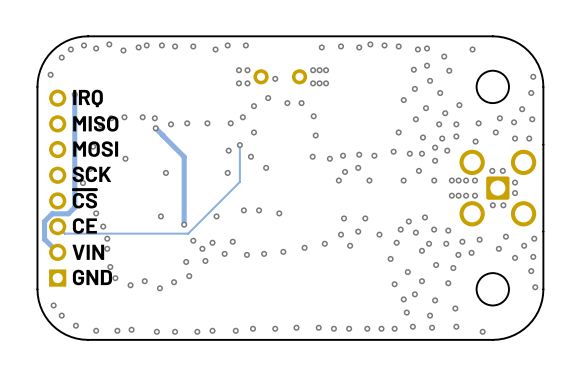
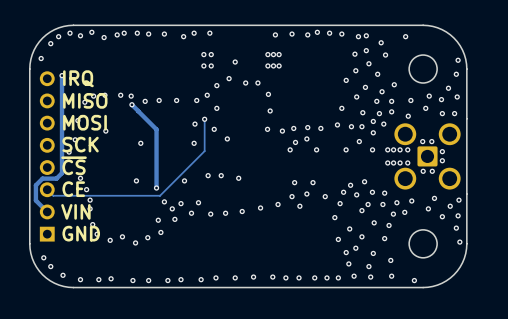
part: (280, 76) -> none

